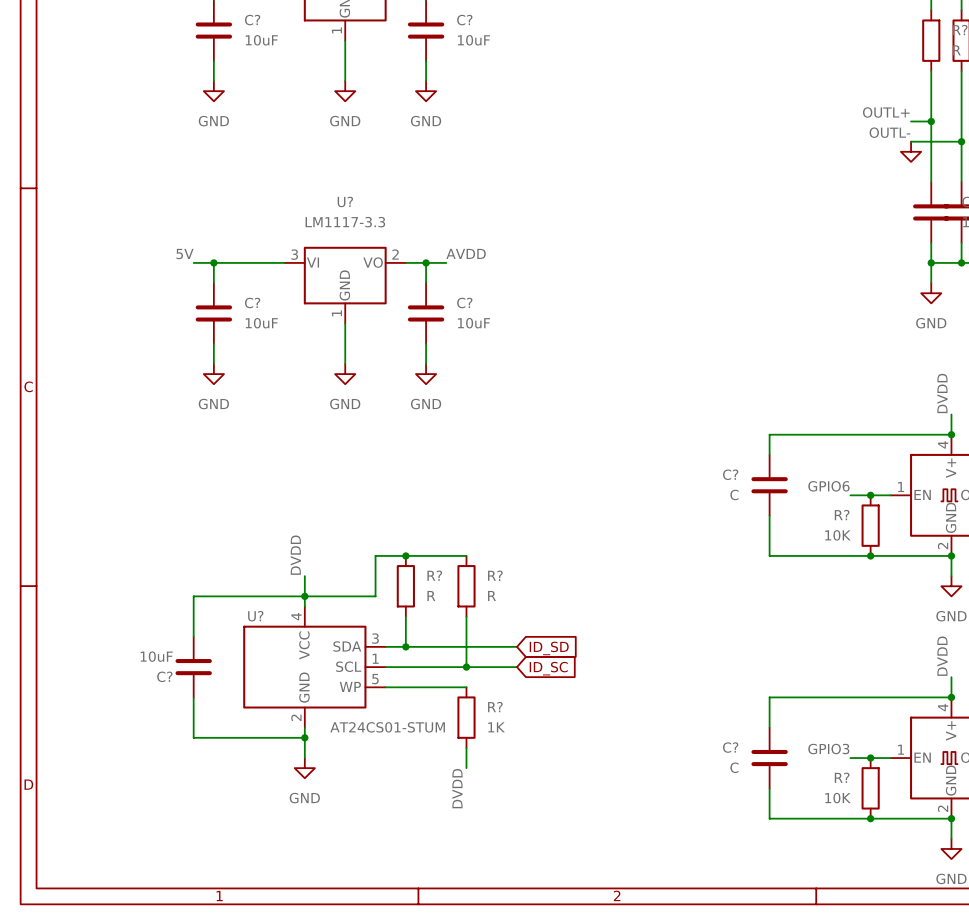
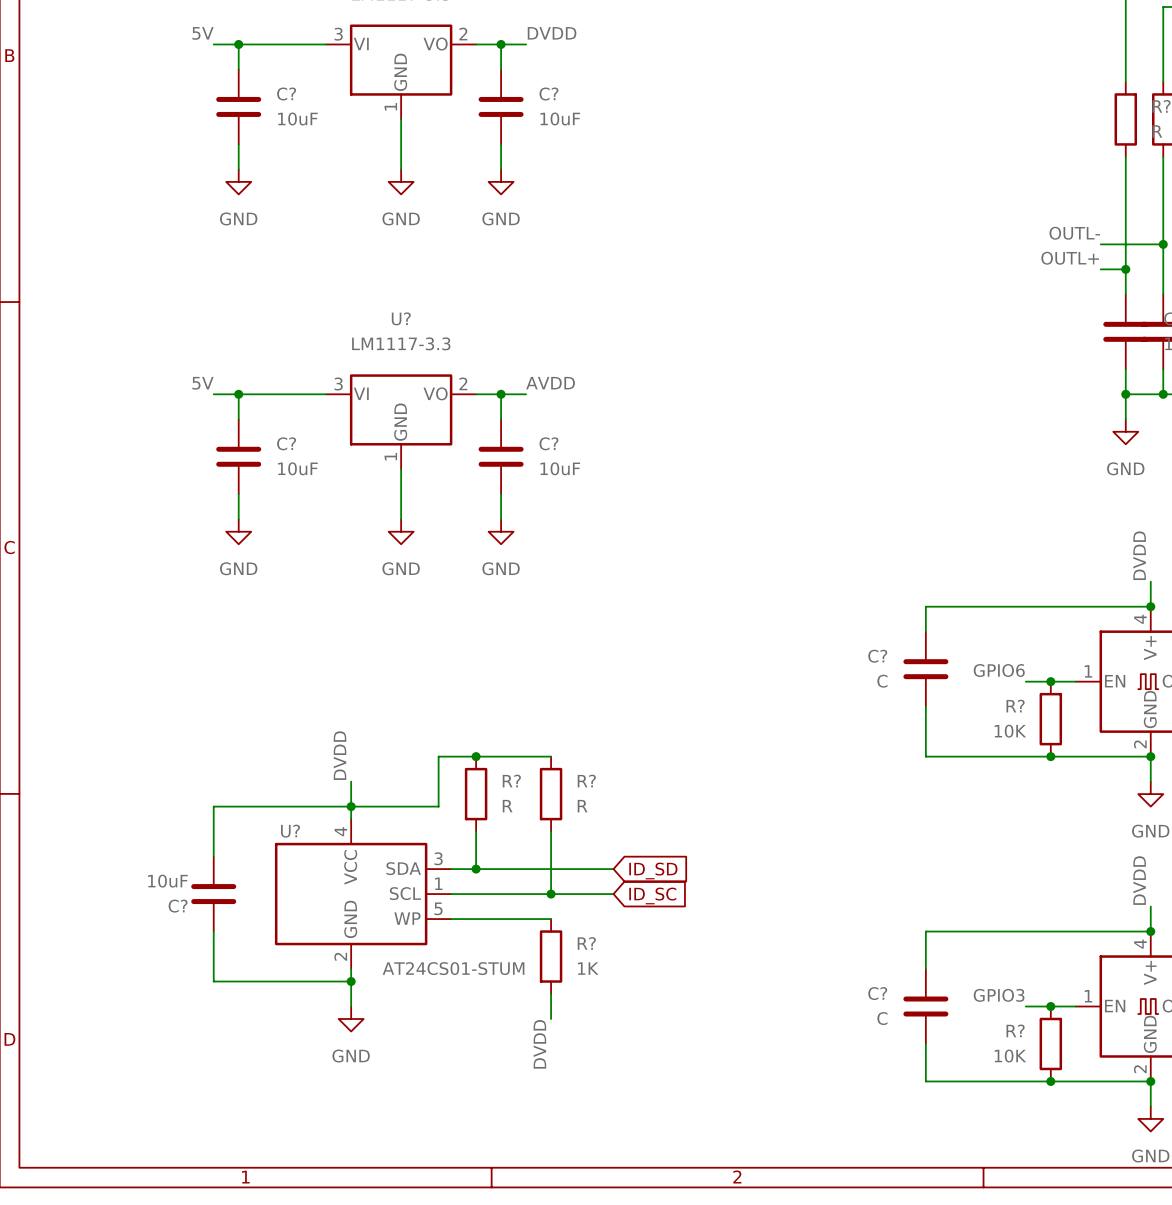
label position: OUTL+ (886, 112) -> OUTL+ (1070, 258)
wire: (911, 121) (931, 121) -> (1100, 269) (1125, 269)
junction position: (931, 121) -> (1125, 269)
power symbol: (911, 151) -> none

